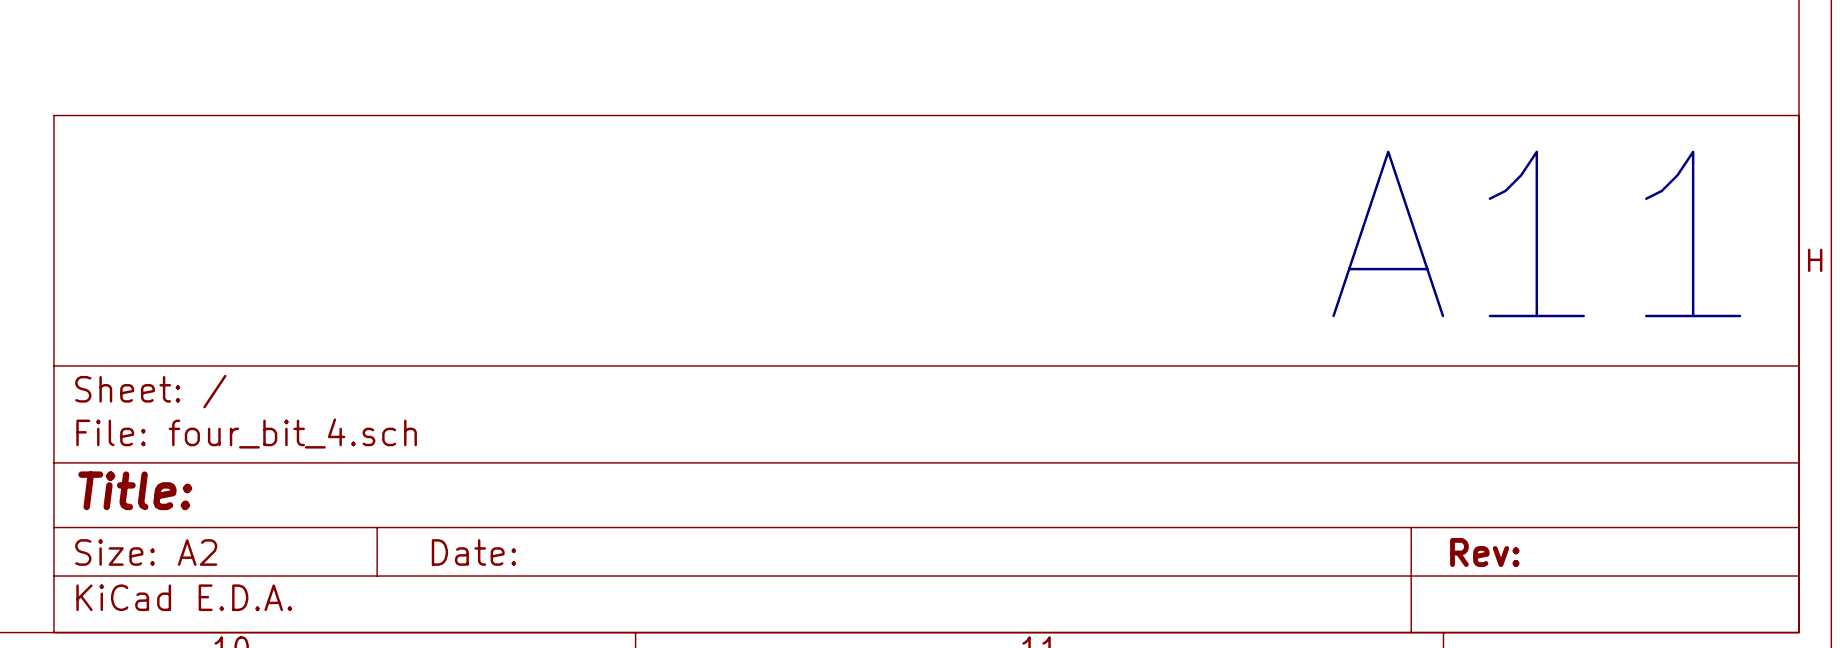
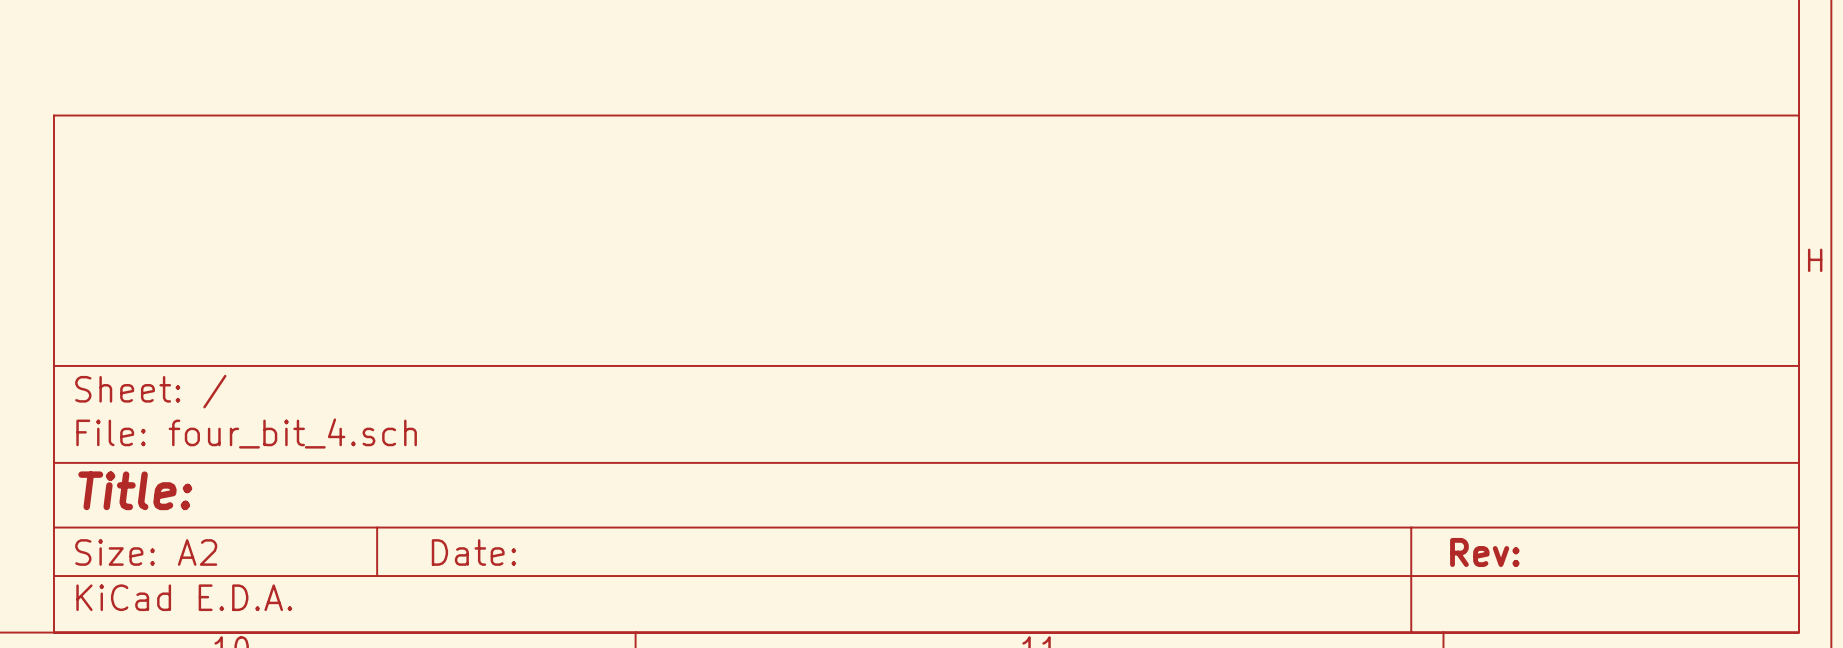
text: A11 (1536, 233) -> none

